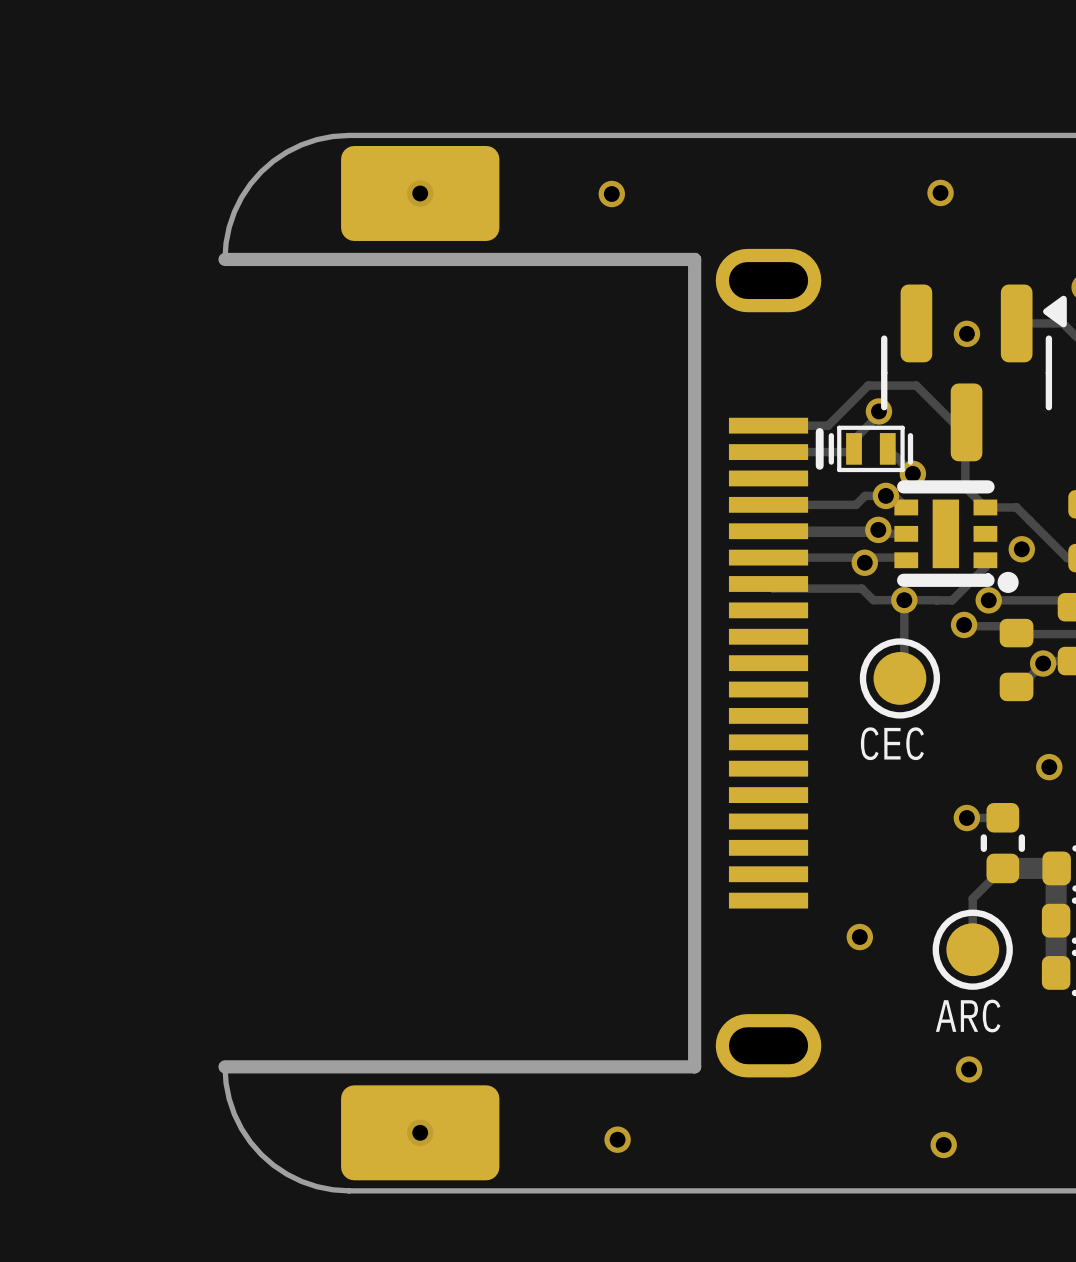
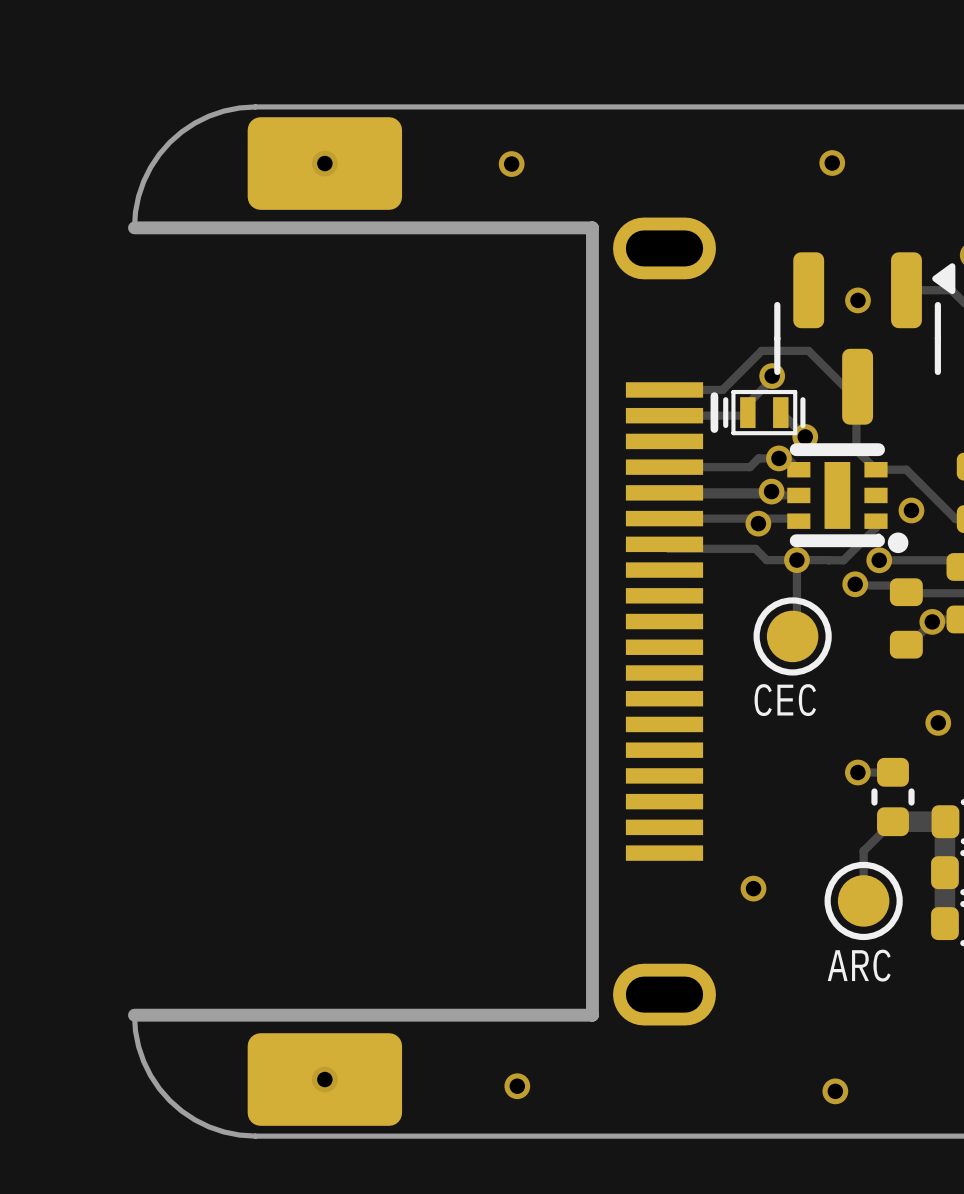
via: (969, 1069) -> none

